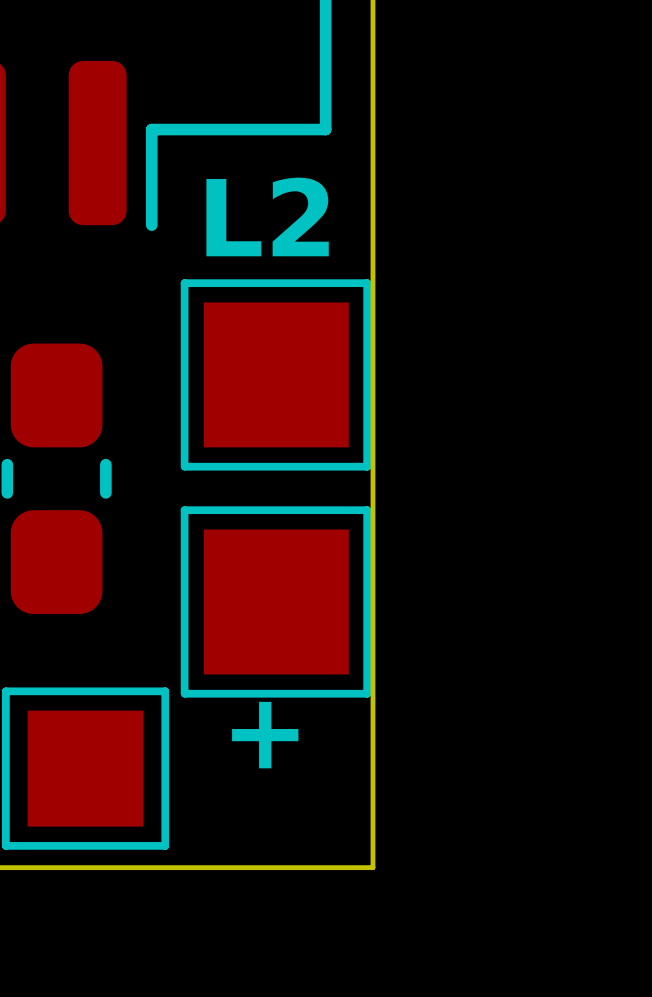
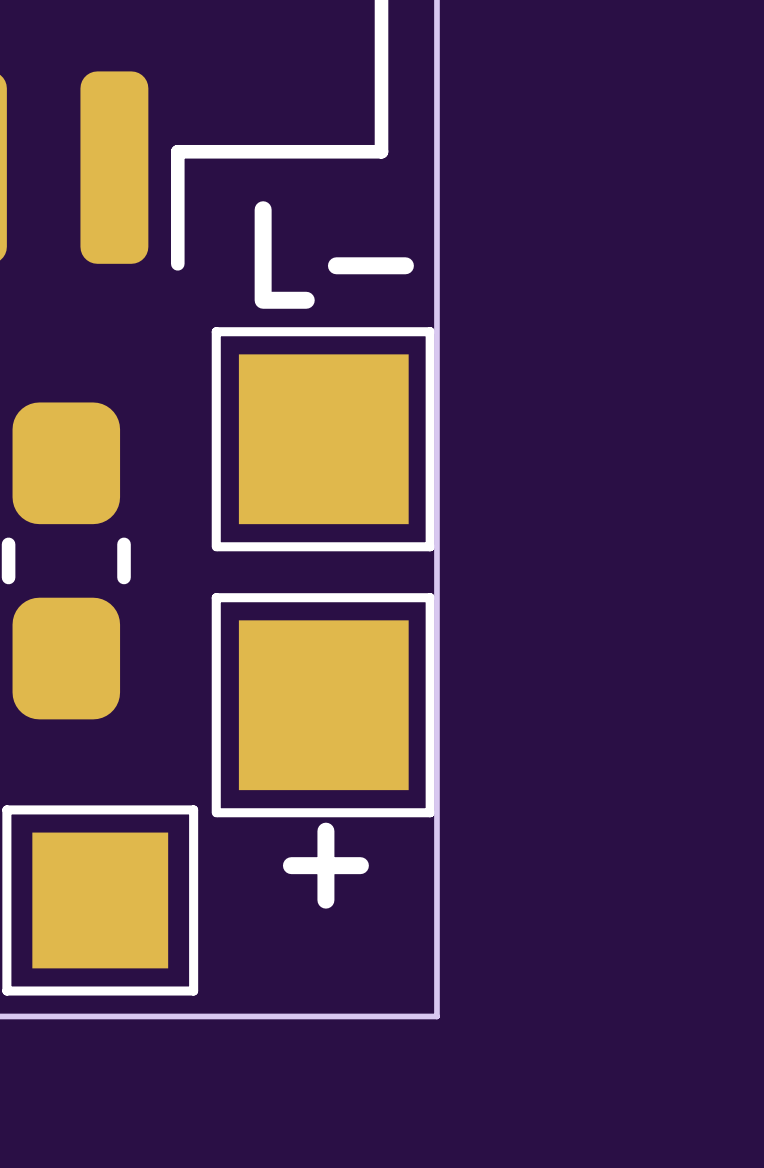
text: L2 (267, 216) -> L- (334, 255)

